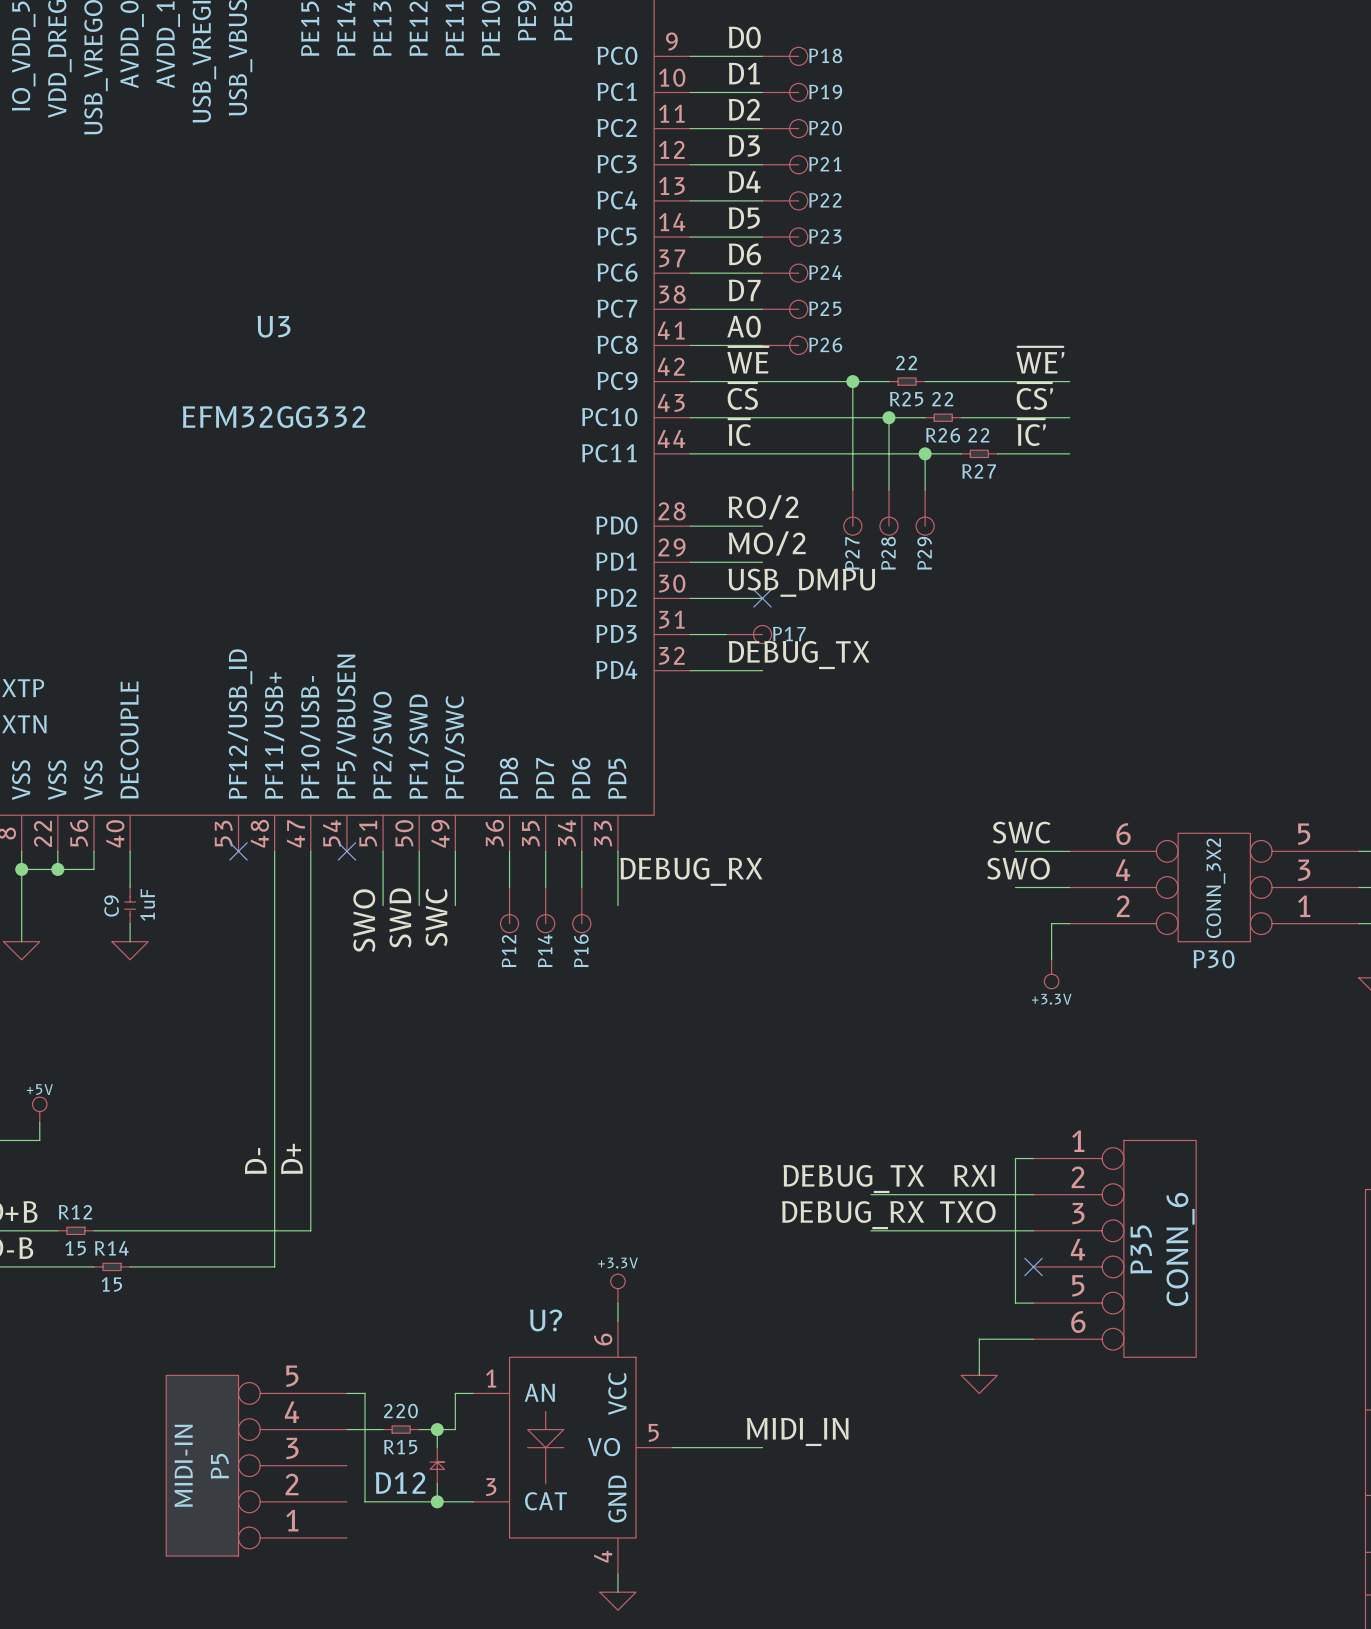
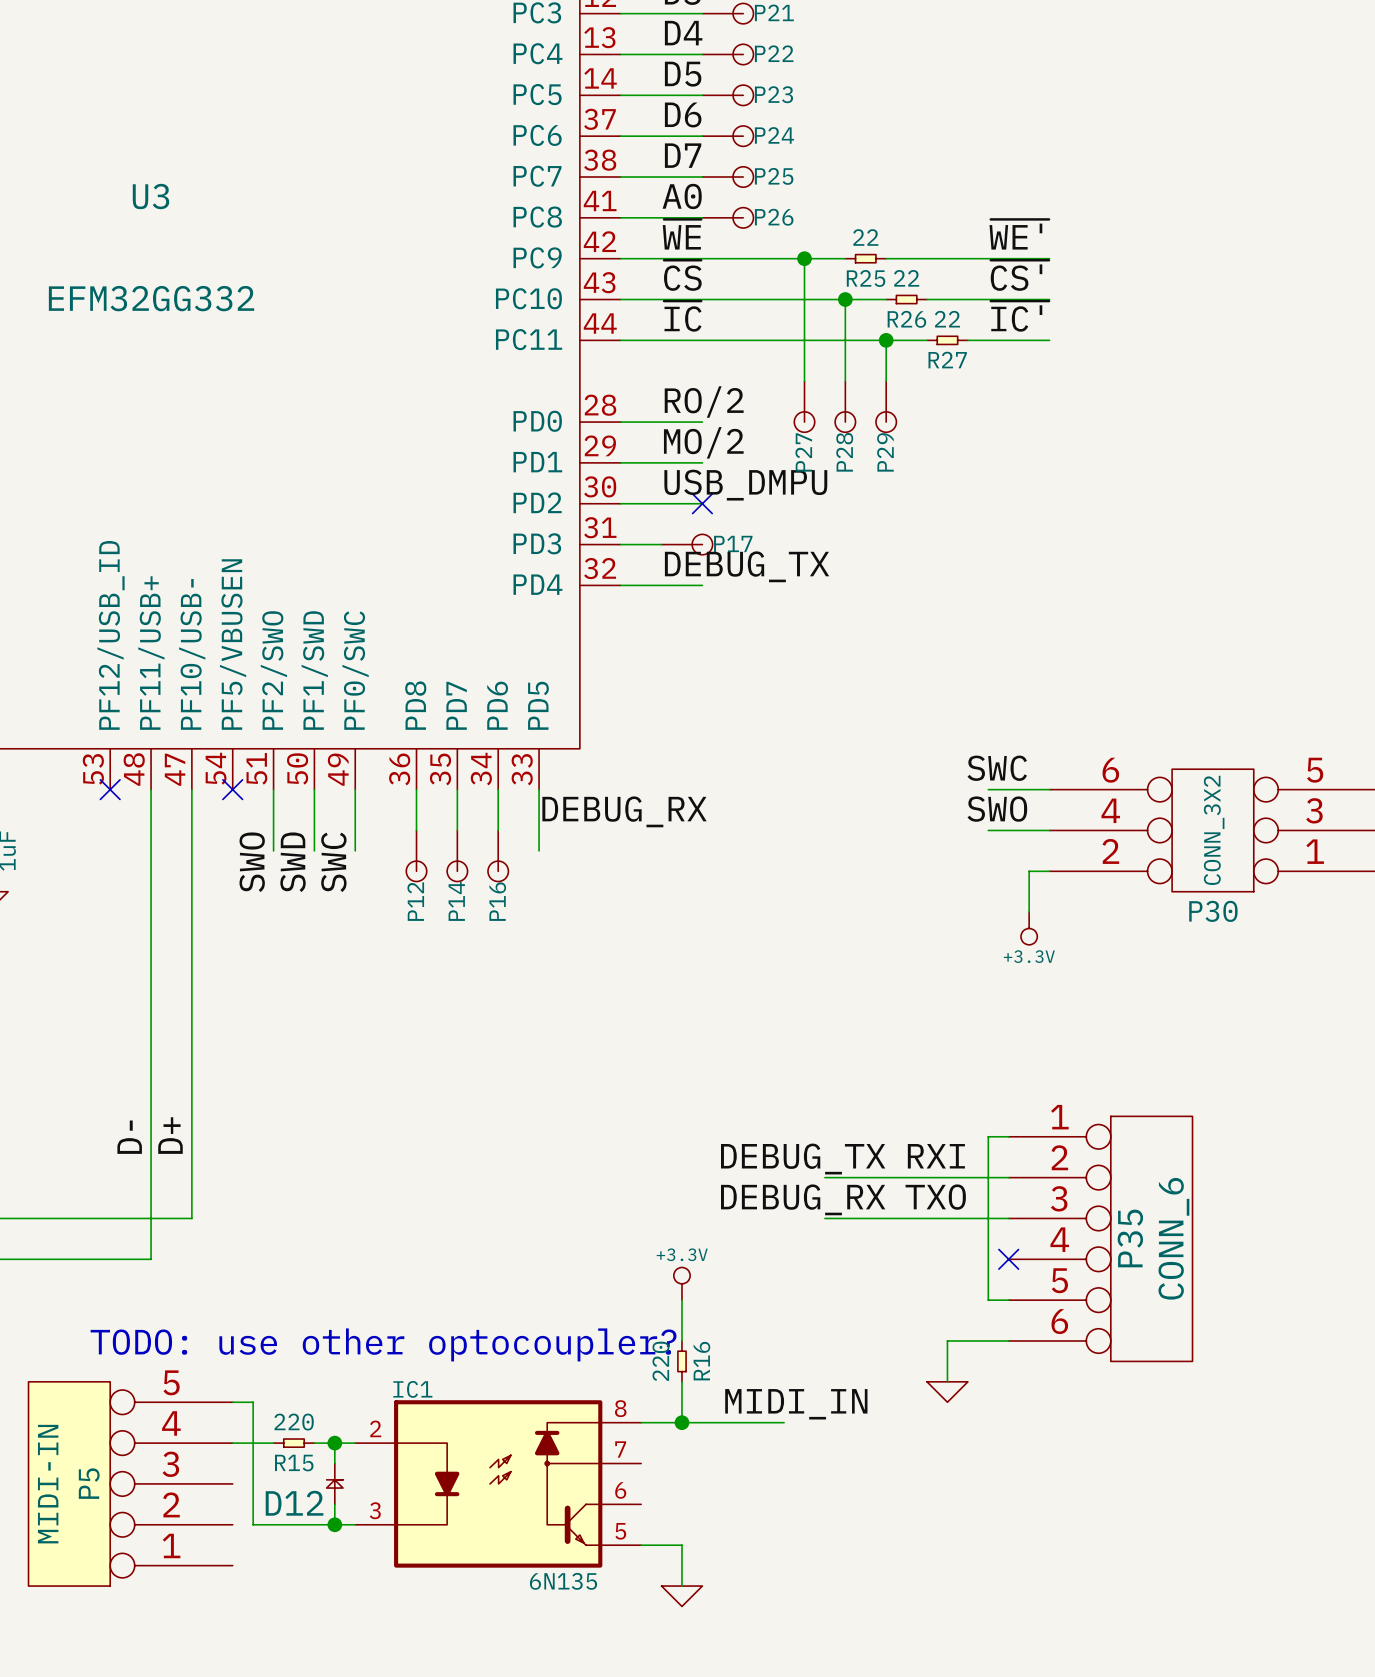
power symbol position: +3.3V (617, 1288) -> +3.3V (681, 1283)
wire: (617, 1303) (617, 1321) -> none
wire: none -> (681, 1300) (681, 1340)
text: none -> TODO: use other optocoupler? (383, 1344)
R16: none -> 220 (681, 1361)
wire: none -> (681, 1381) (681, 1422)
wire: (473, 1393) (455, 1393) (455, 1429) -> none
wire: none -> (641, 1422) (784, 1422)
junction: none -> (681, 1422)
label position: MIDI_IN (797, 1431) -> MIDI_IN (796, 1404)
U?: (572, 1447) -> none
wire: (672, 1447) (762, 1447) -> none
IC1: none -> 6N135 (498, 1483)
wire: none -> (641, 1545) (681, 1545) (681, 1586)
wire: (617, 1574) (617, 1592) -> none
power symbol position: (617, 1601) -> (681, 1596)

